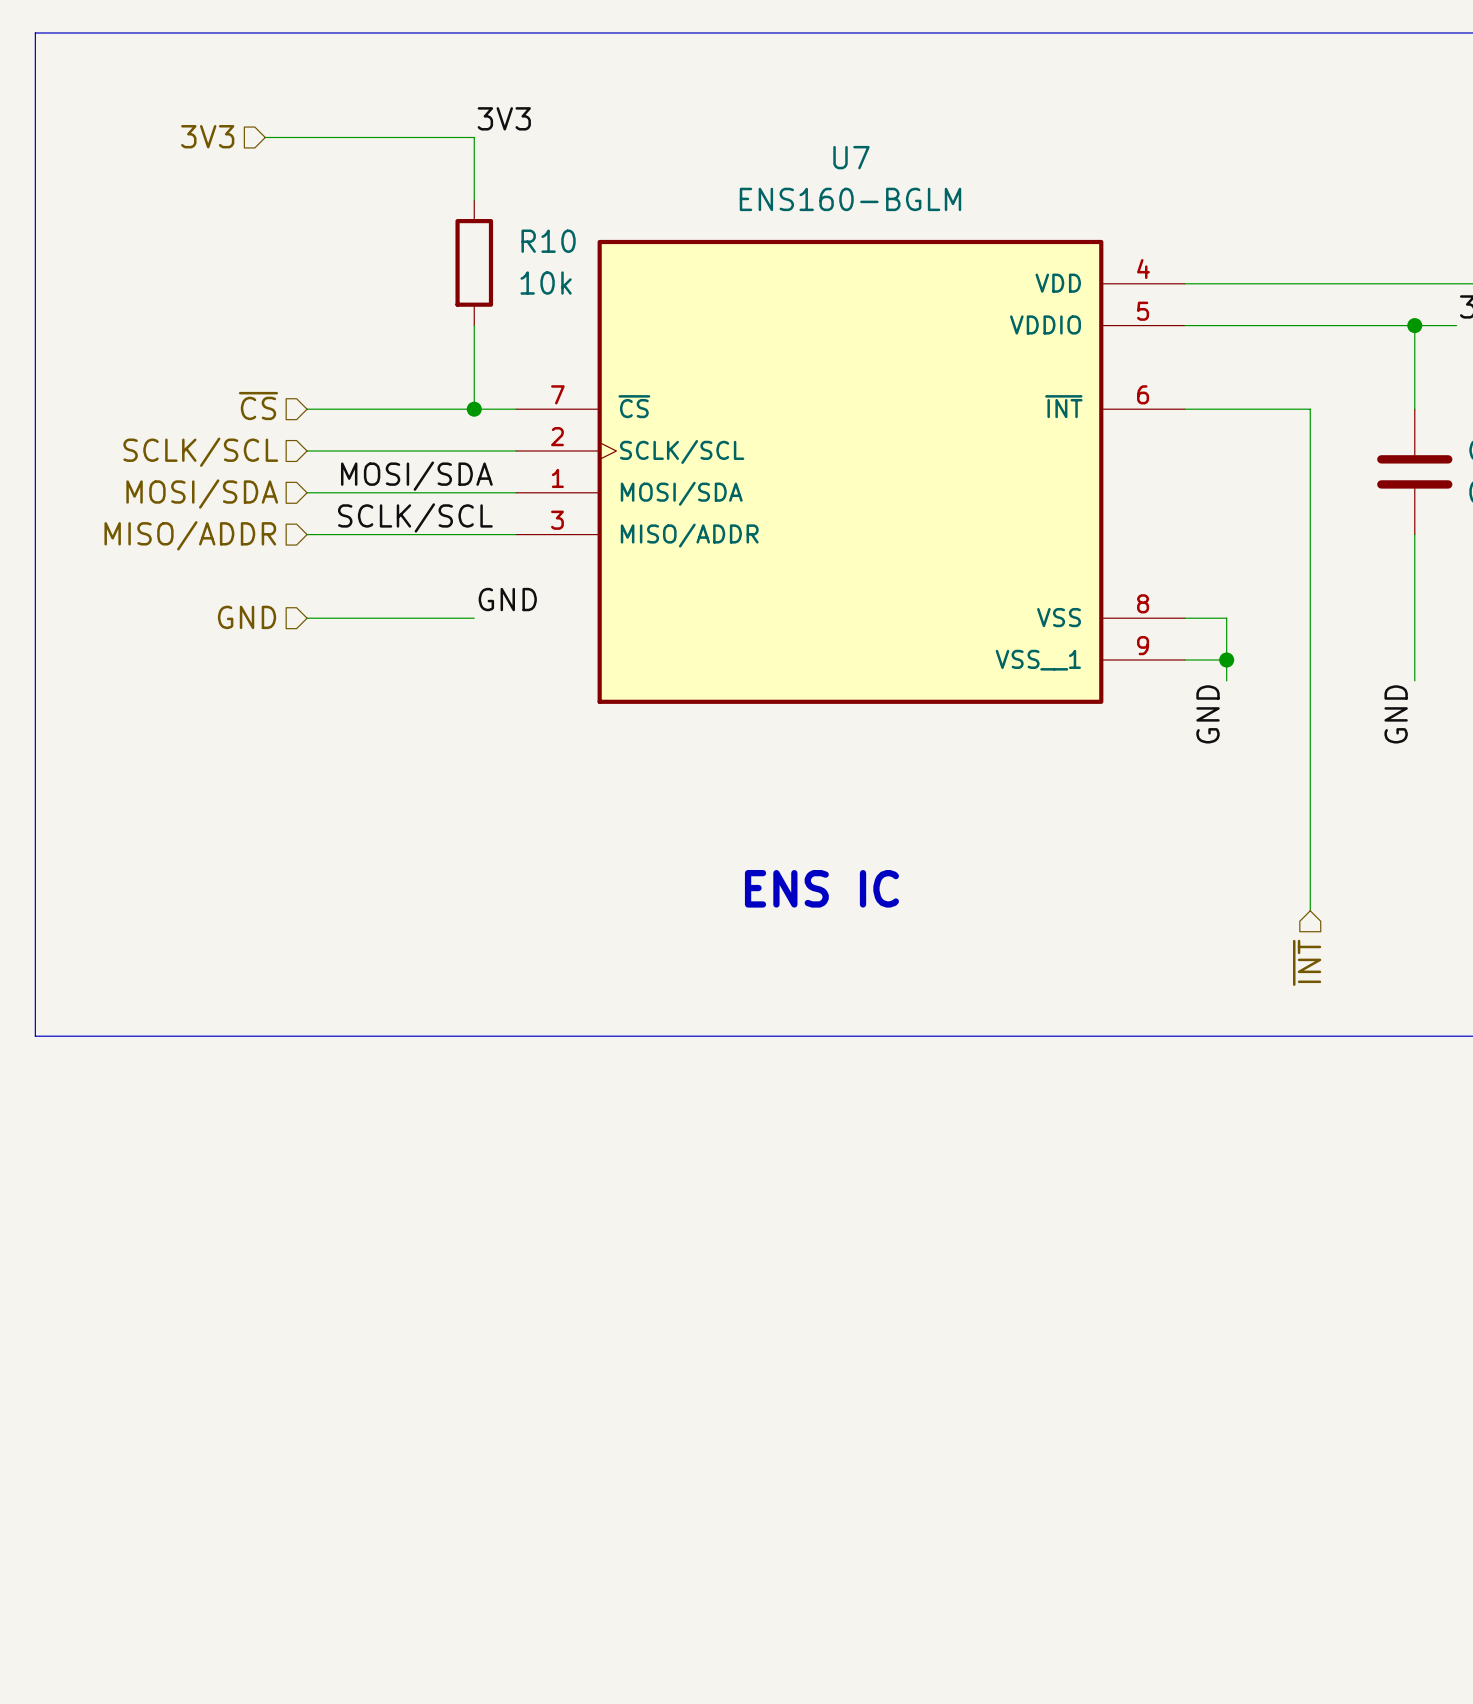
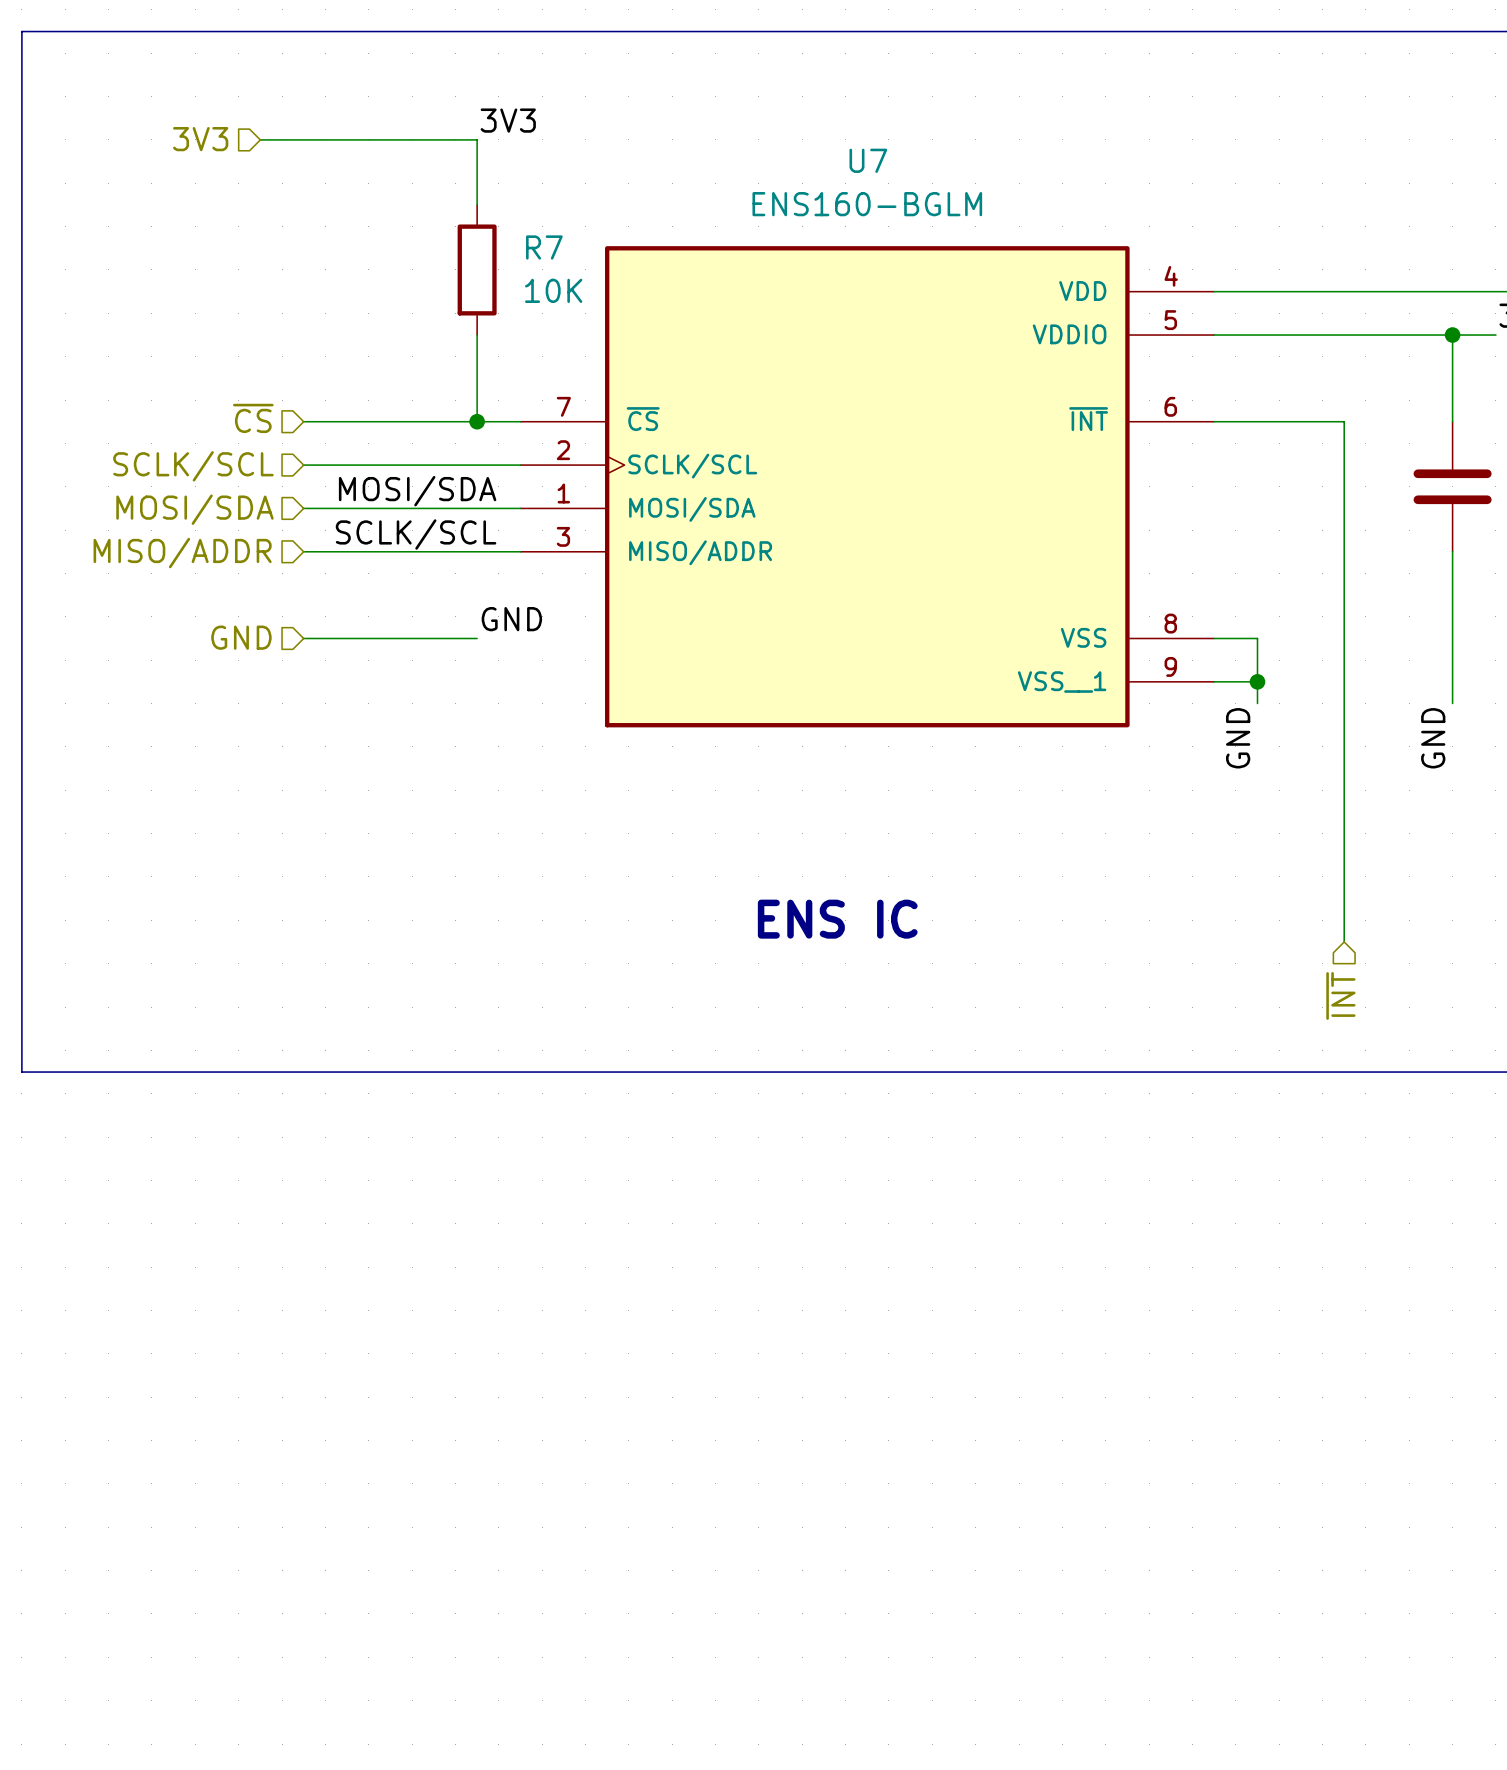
R10 name: R10 (548, 241) -> R7 (544, 247)
R10 value: 10k (546, 283) -> 10K (553, 290)

